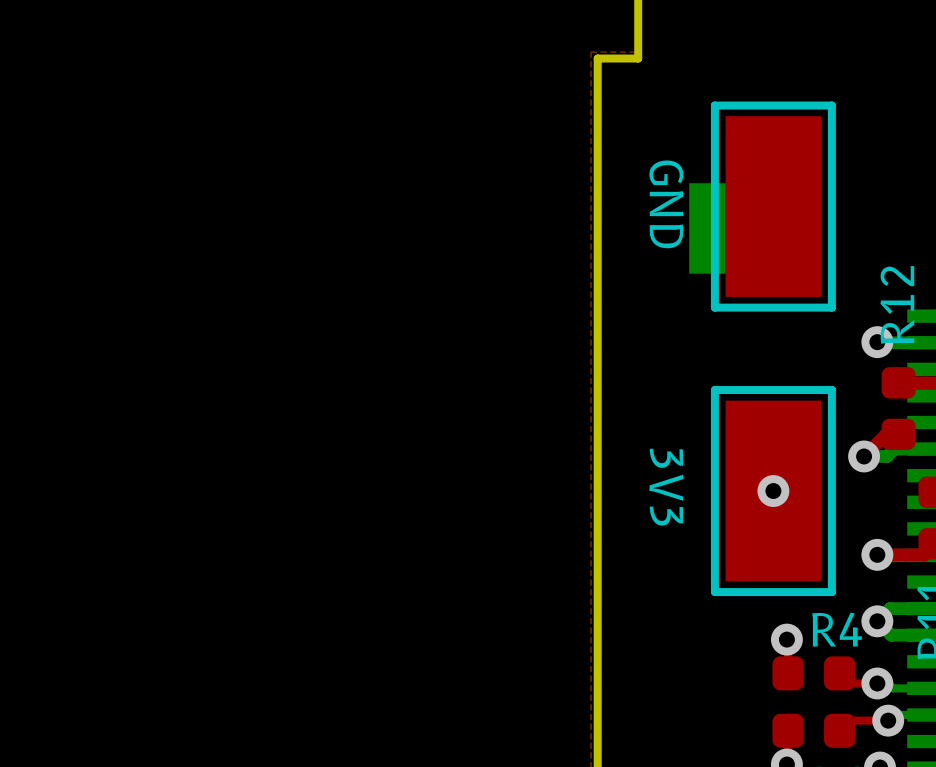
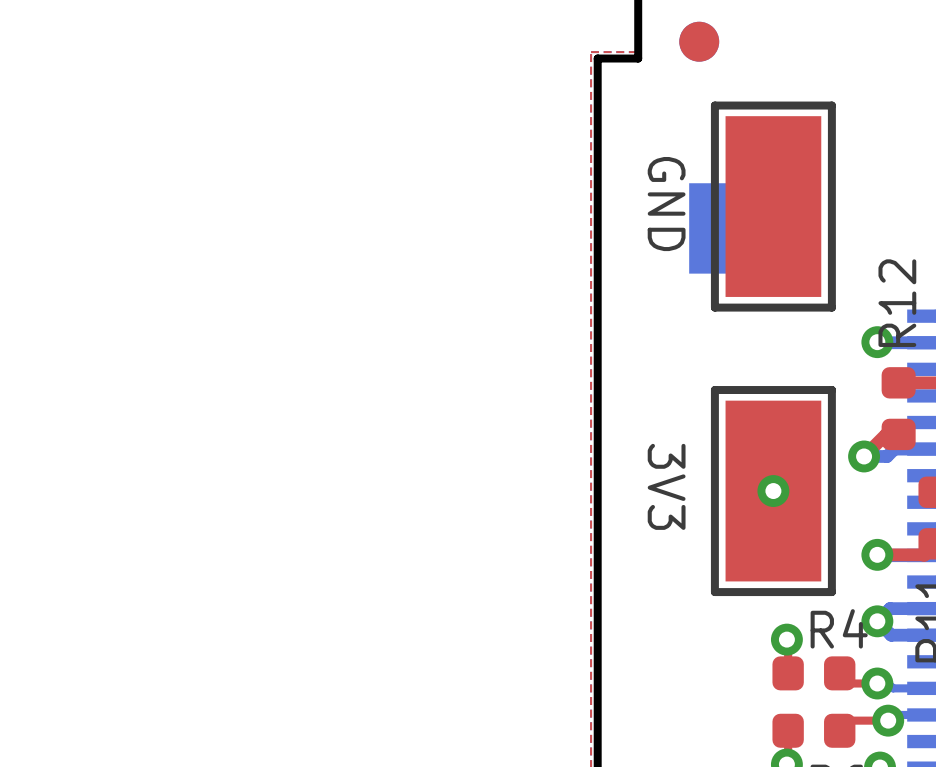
part: none -> (699, 41)

